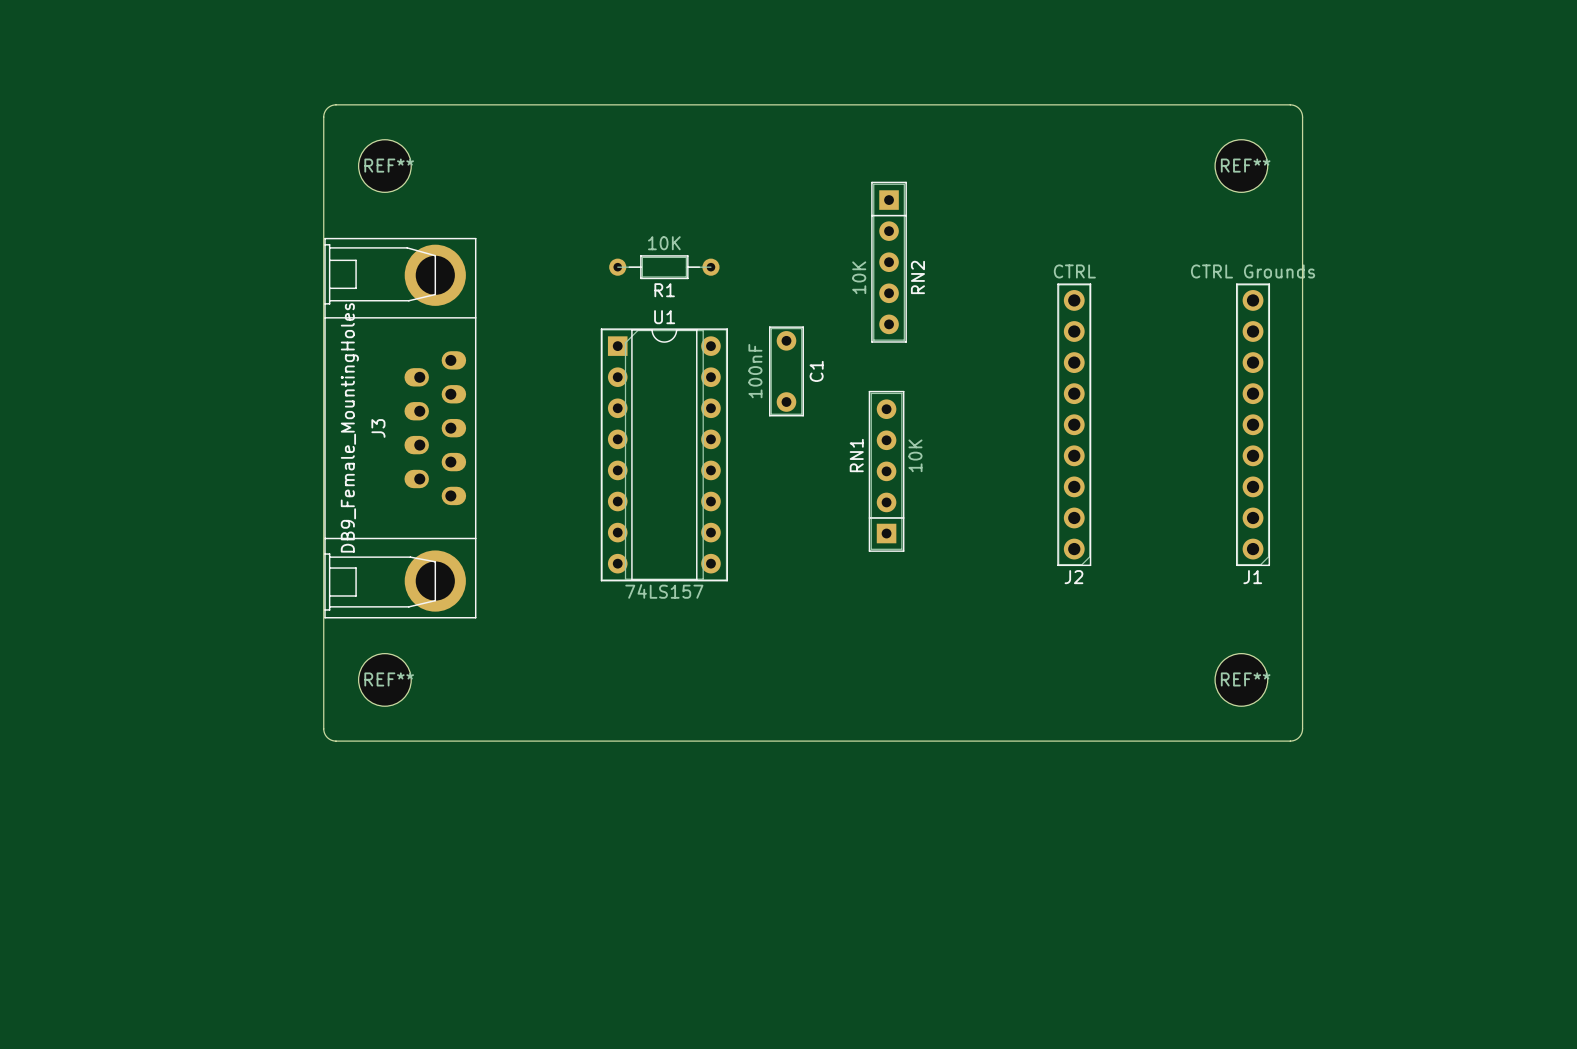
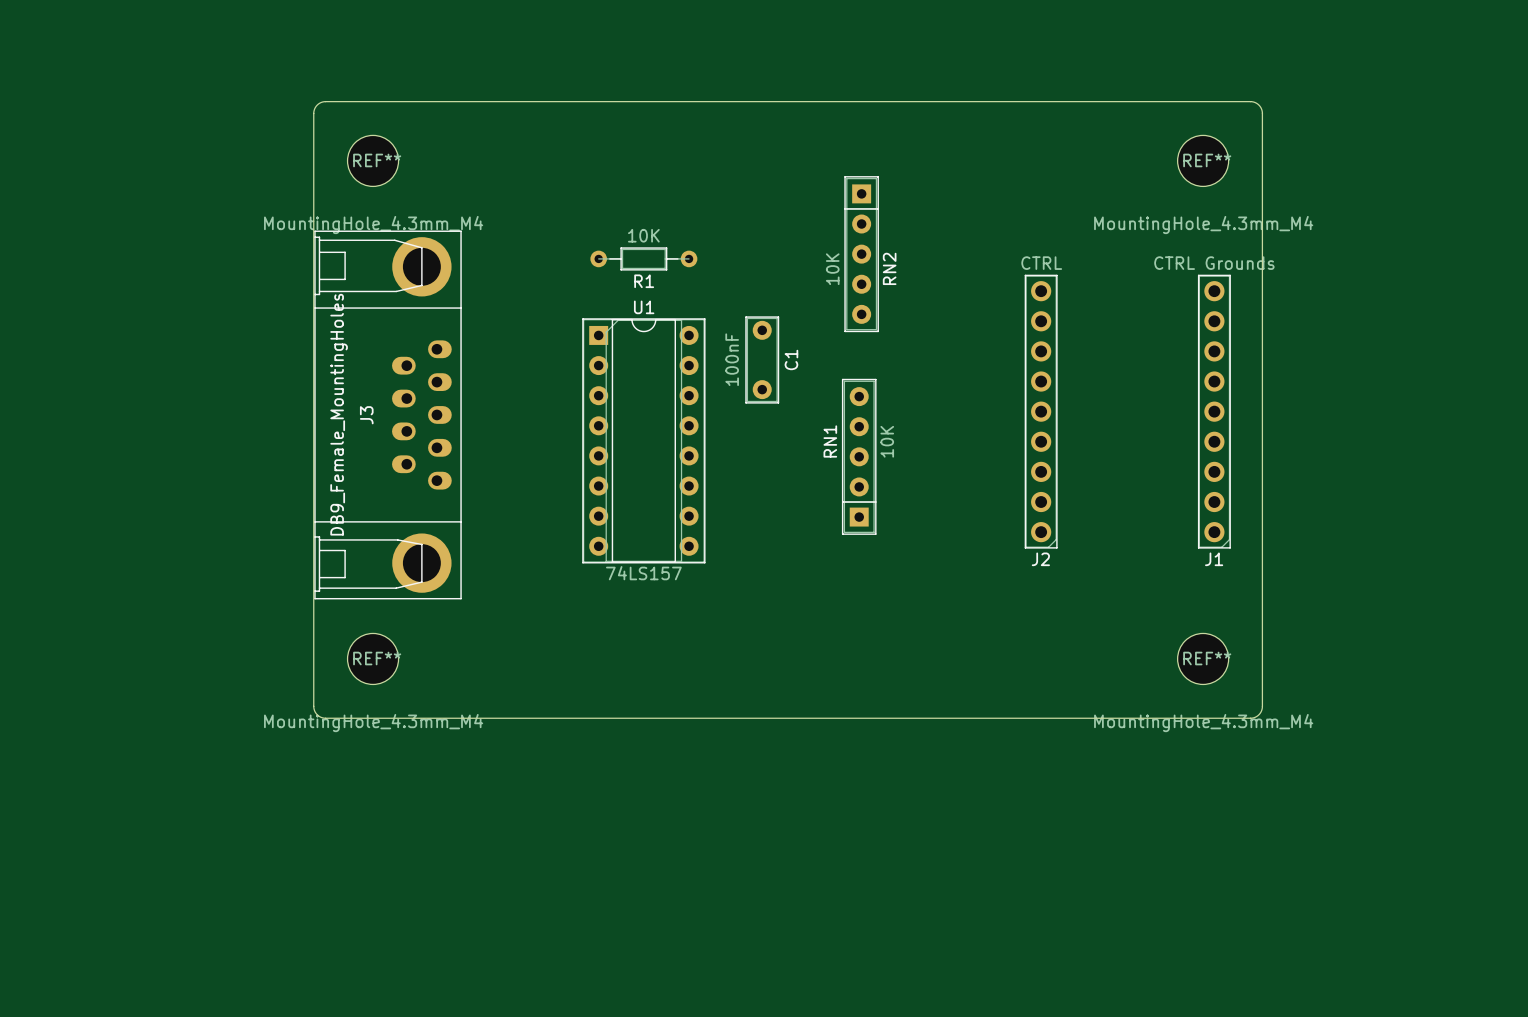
REF** value: none -> MountingHole_4.3mm_M4 (373, 225)
REF** value: none -> MountingHole_4.3mm_M4 (1203, 225)
REF** value: none -> MountingHole_4.3mm_M4 (373, 723)
REF** value: none -> MountingHole_4.3mm_M4 (1203, 723)

